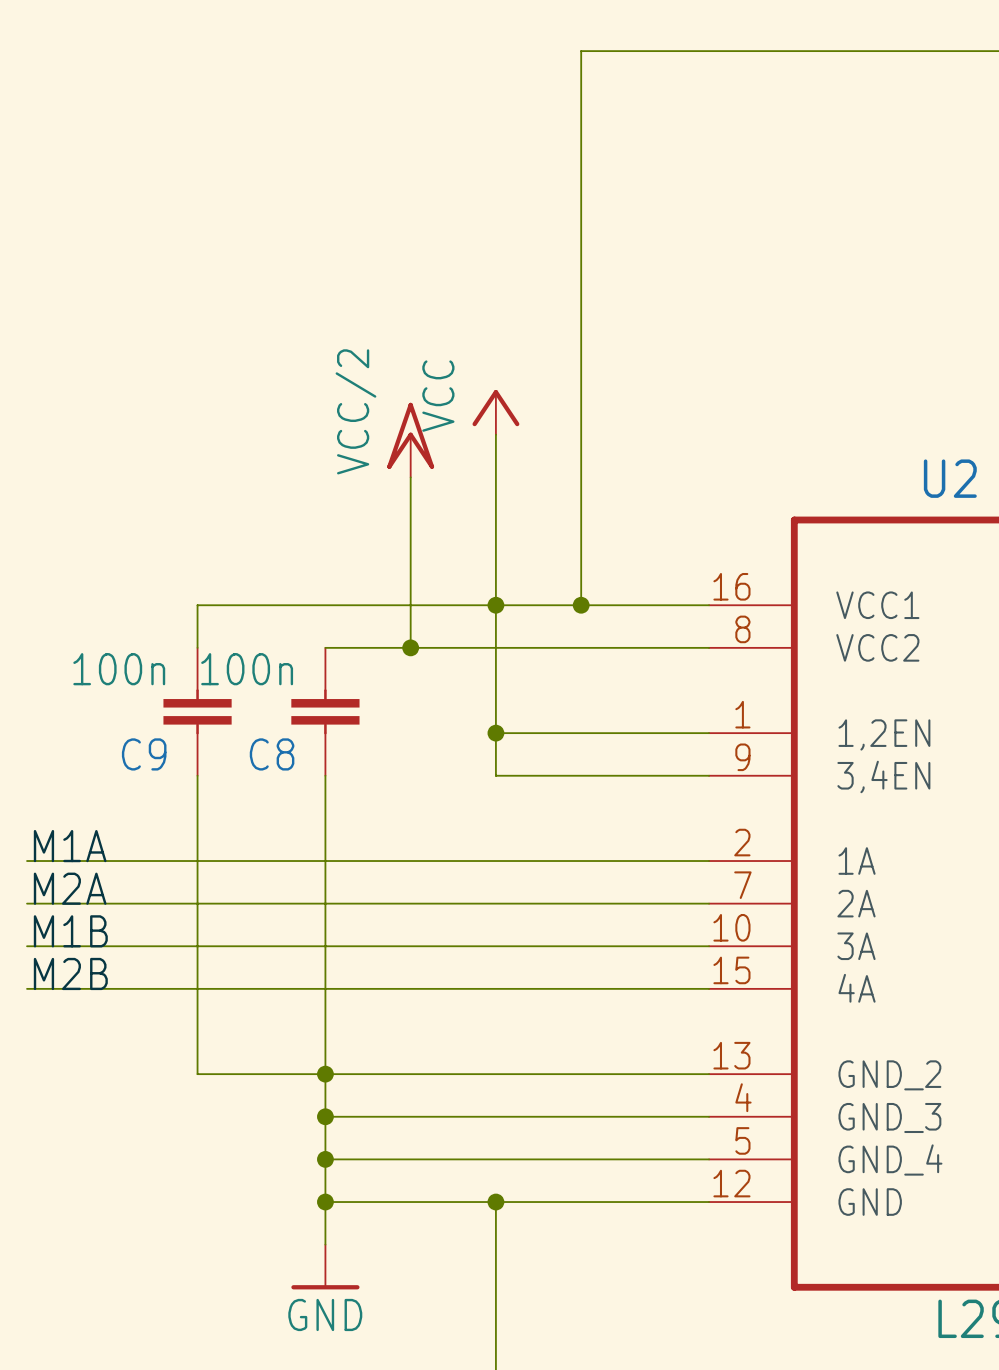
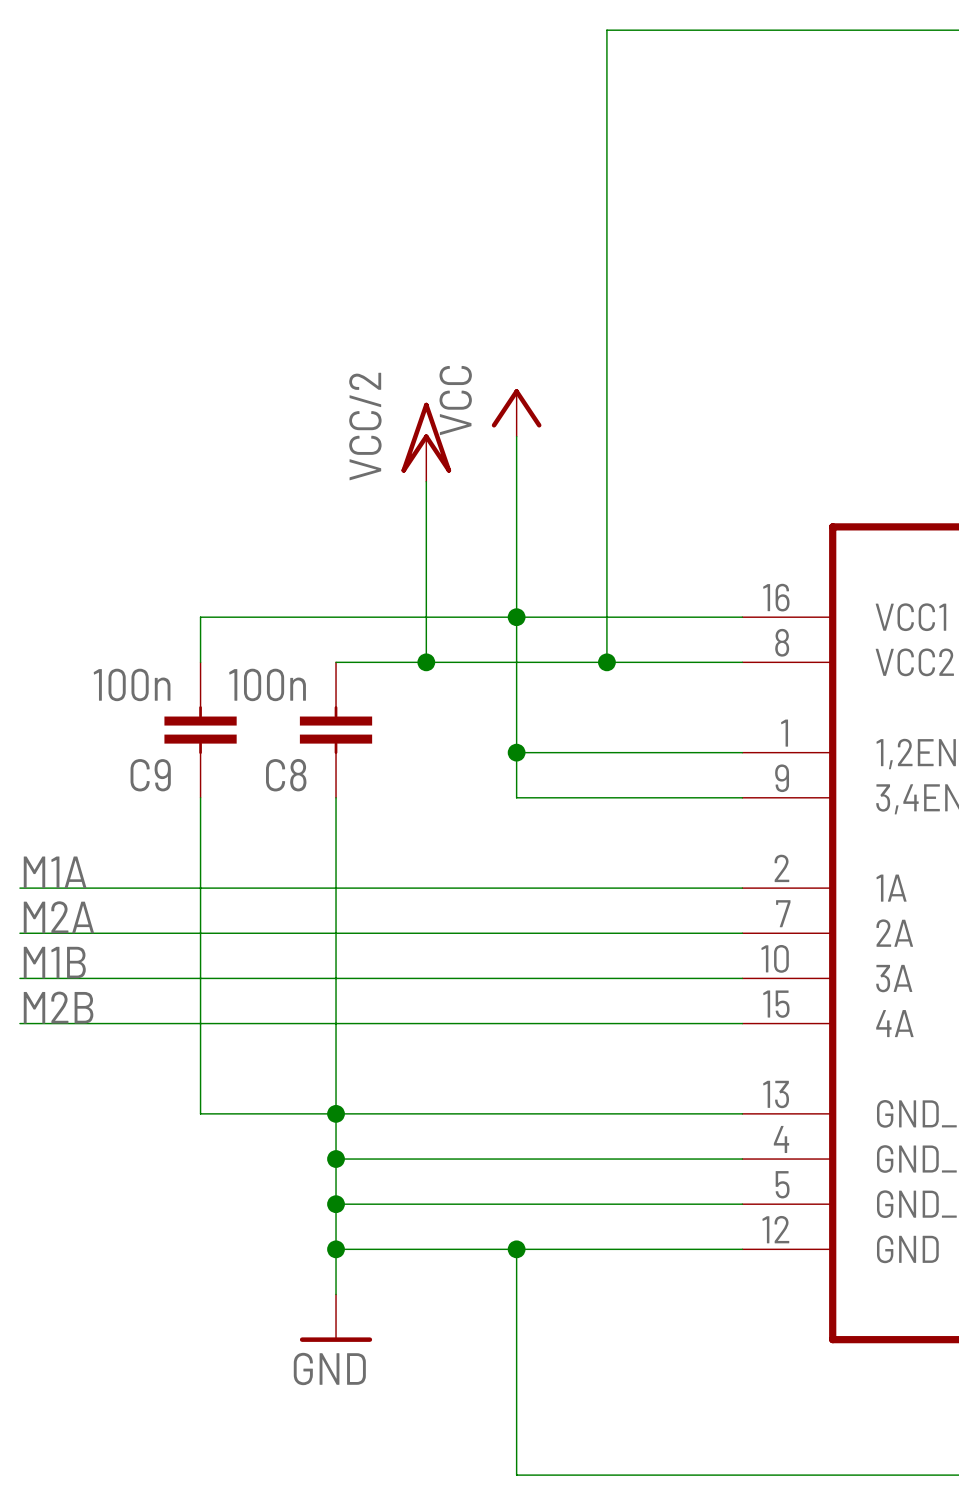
wire: none -> (606, 617) (606, 662)
junction position: (581, 605) -> (606, 662)

